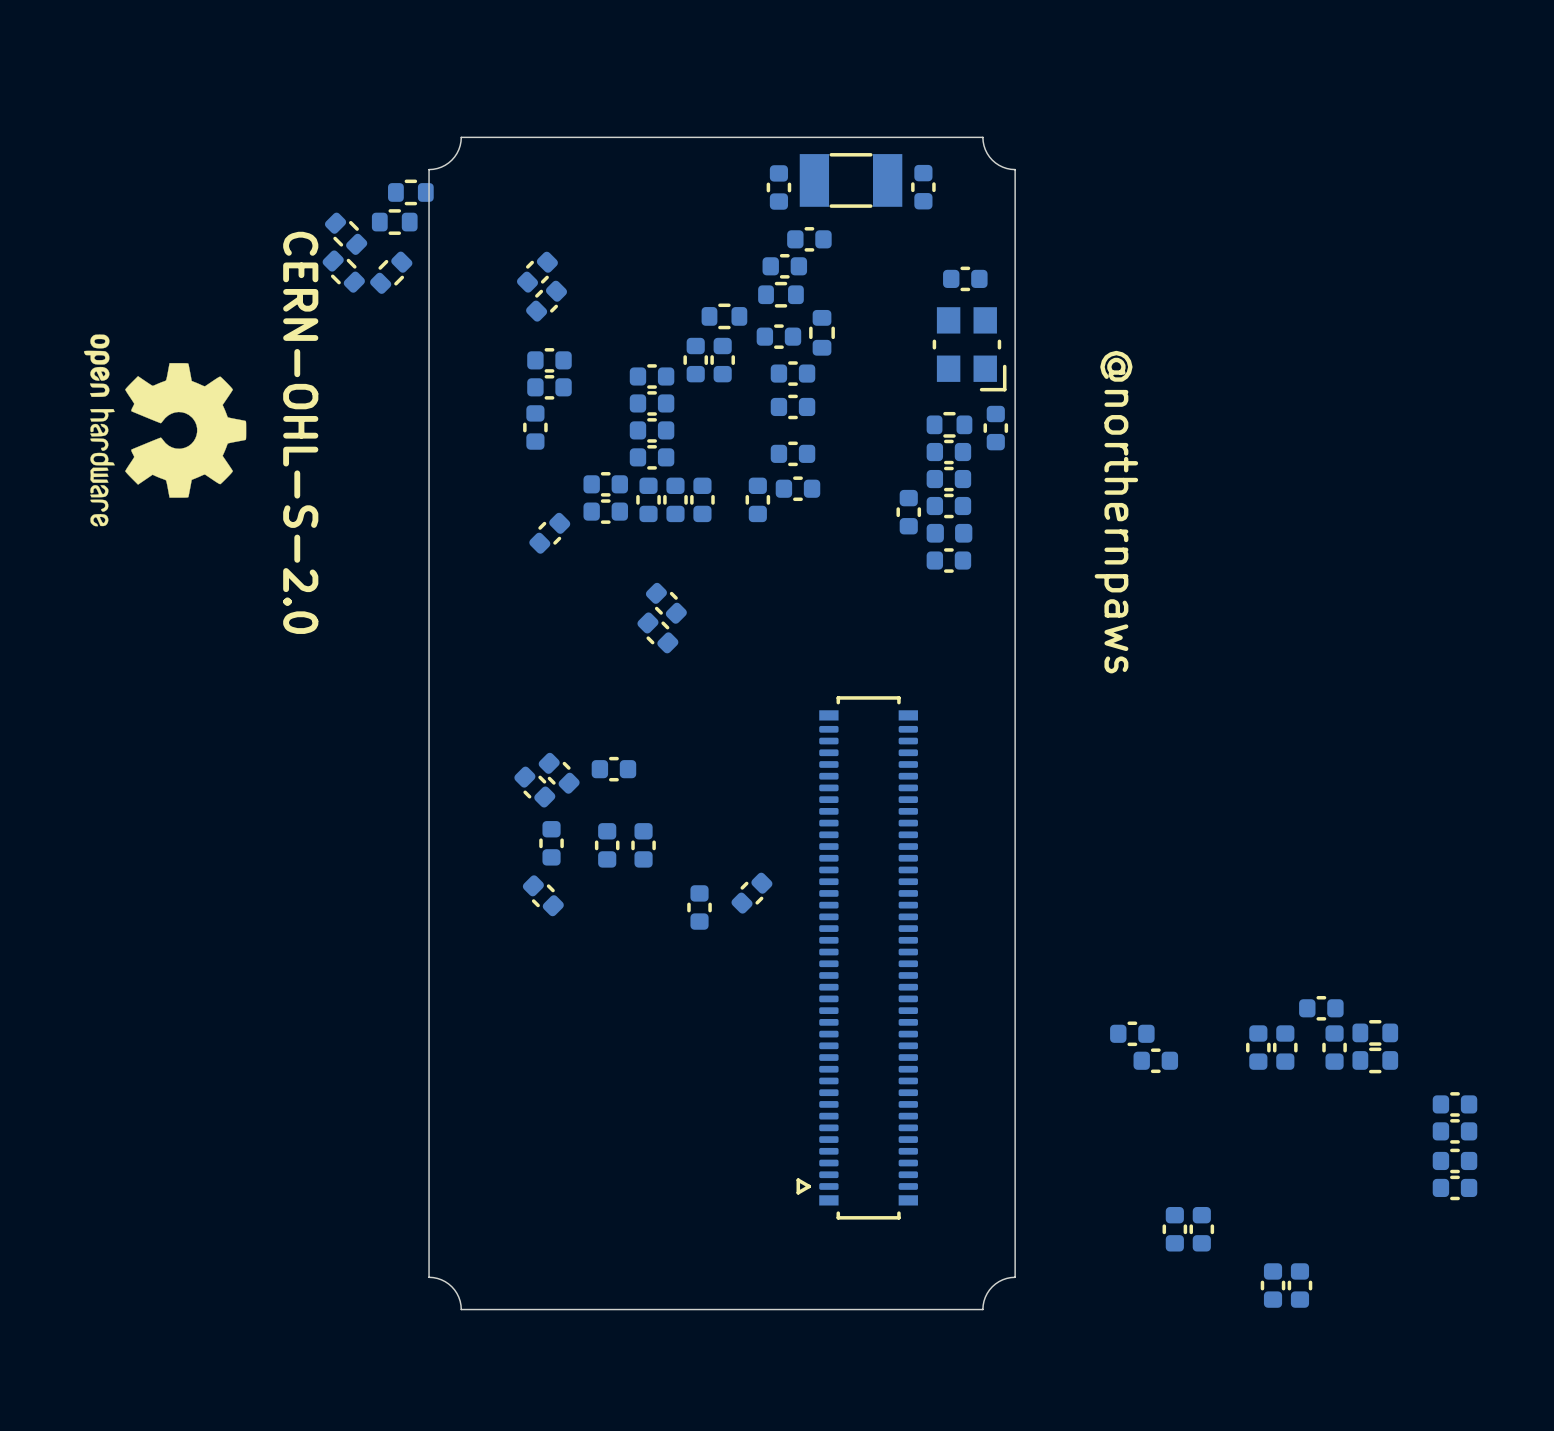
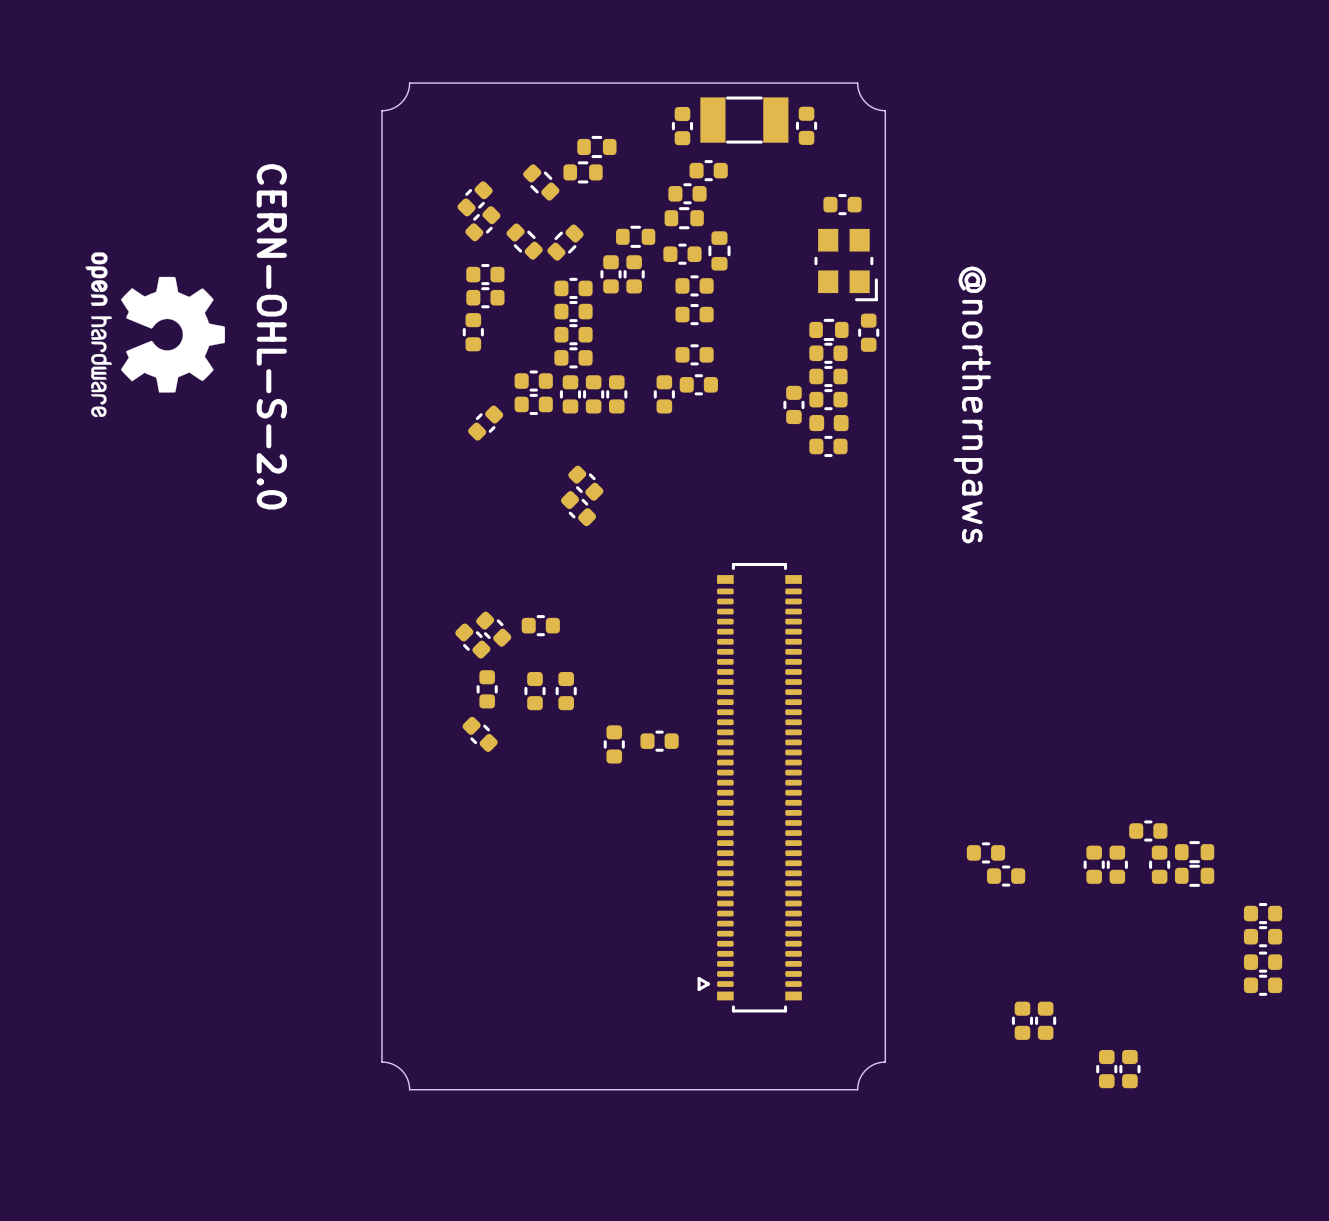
part: (410, 192) -> none
part: none -> (596, 146)
part: (394, 222) -> none
part: (346, 233) -> none
part: none -> (583, 172)
part: none -> (541, 182)
part: (343, 271) -> none
part: (391, 272) -> none
part: none -> (524, 241)
part: none -> (565, 242)
part rotation: 0° (751, 893) -> 45° clockwise (659, 741)

